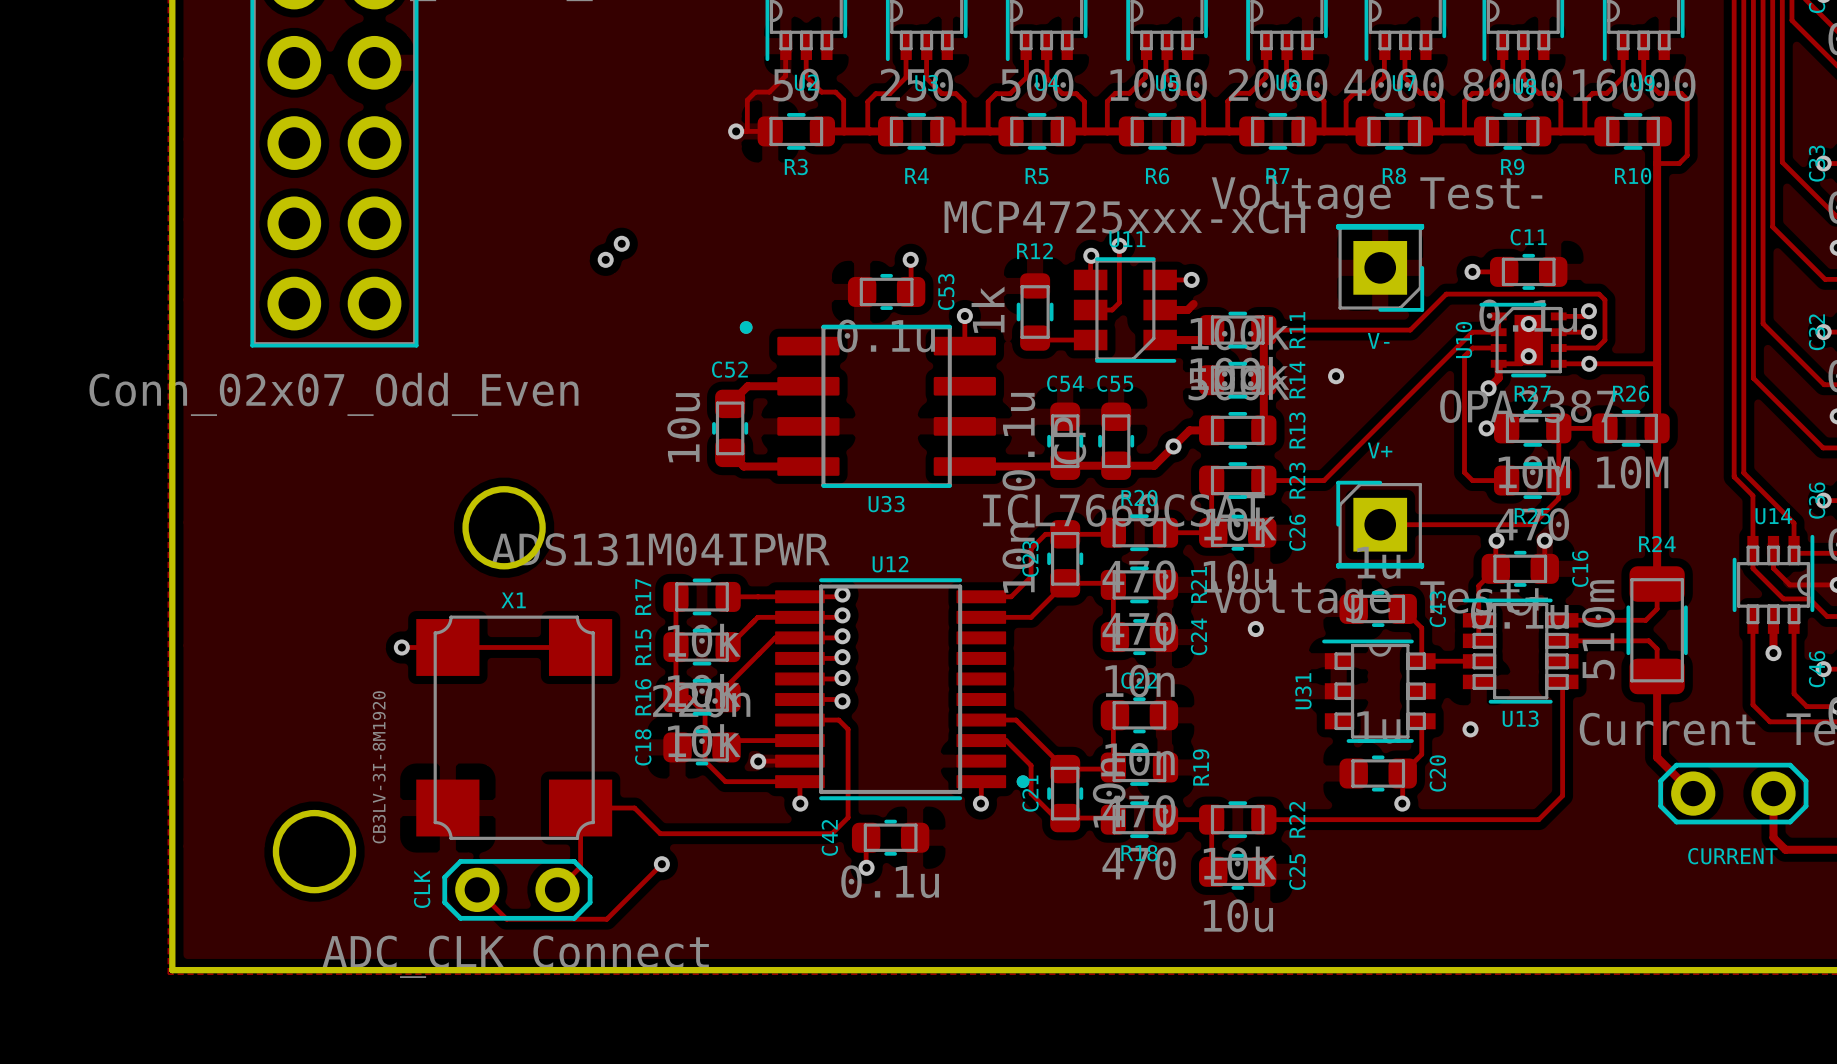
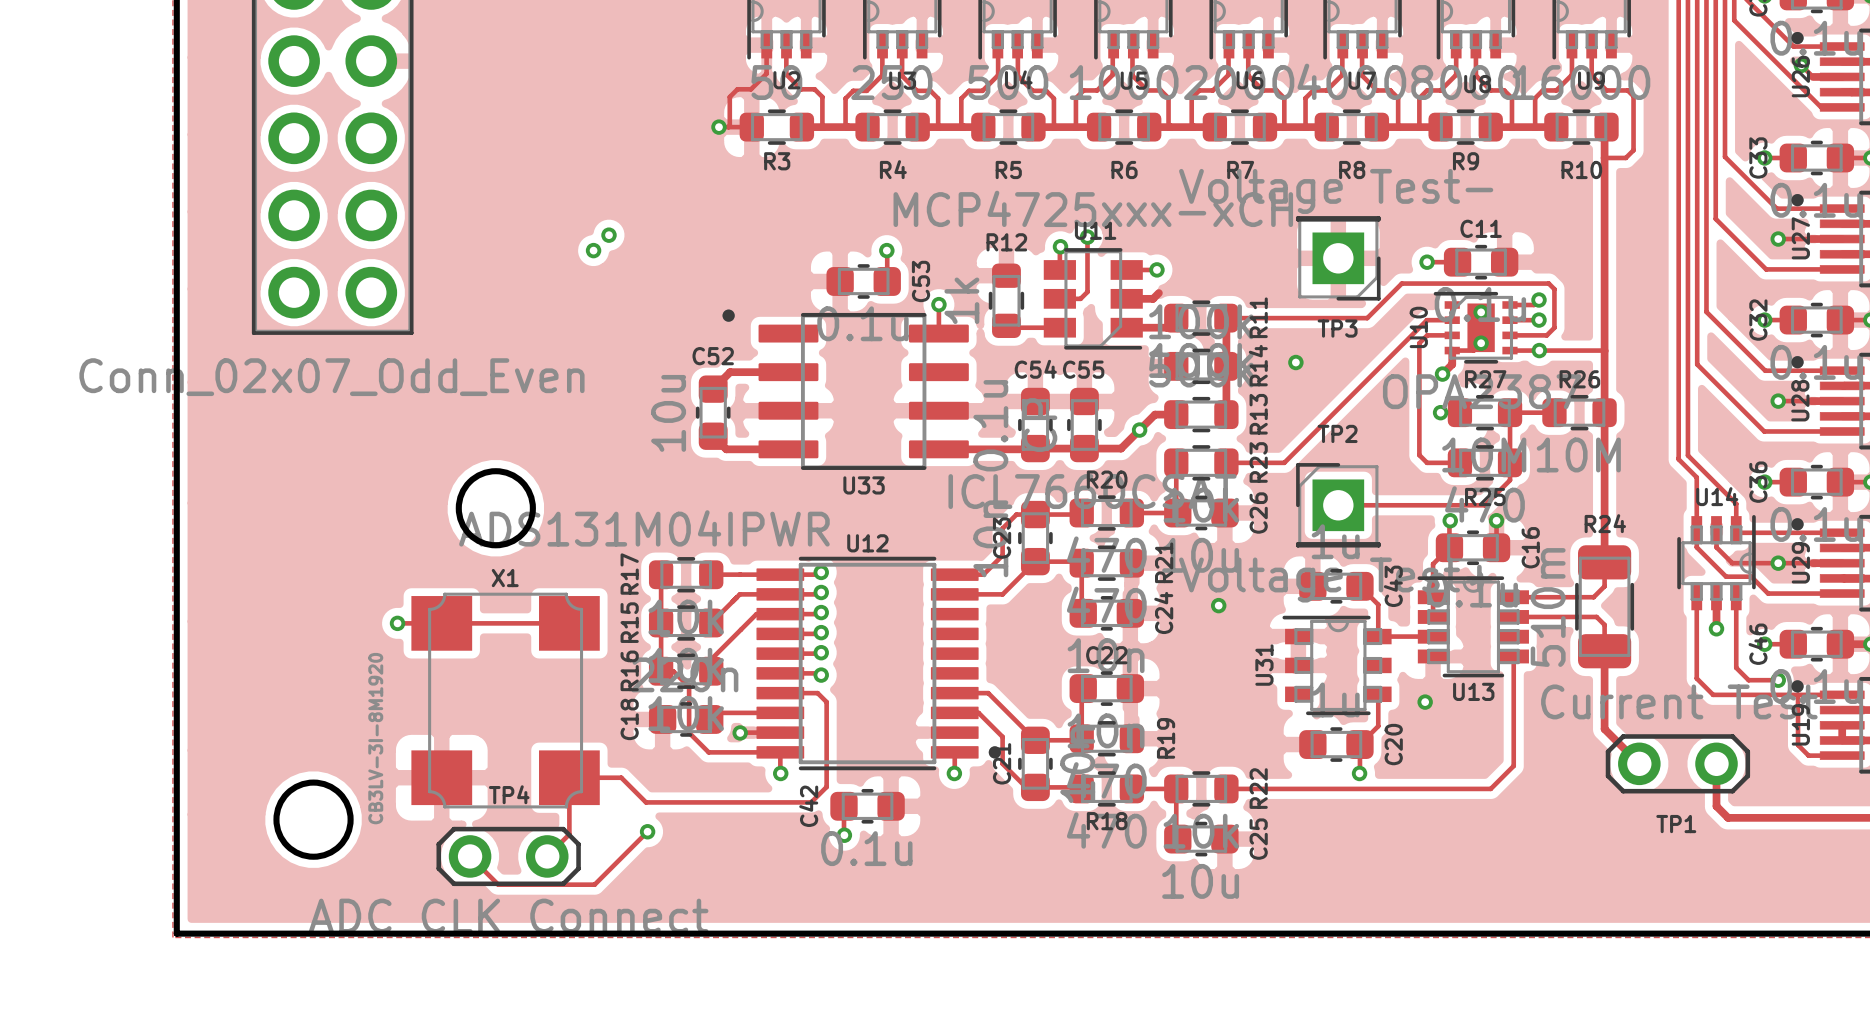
V- name: V- (1378, 340) -> TP3 (1337, 328)
V+ name: V+ (1380, 450) -> TP2 (1337, 433)
CURRENT name: CURRENT (1732, 856) -> TP1 (1676, 824)
CLK name: CLK (422, 889) -> TP4 (509, 794)

